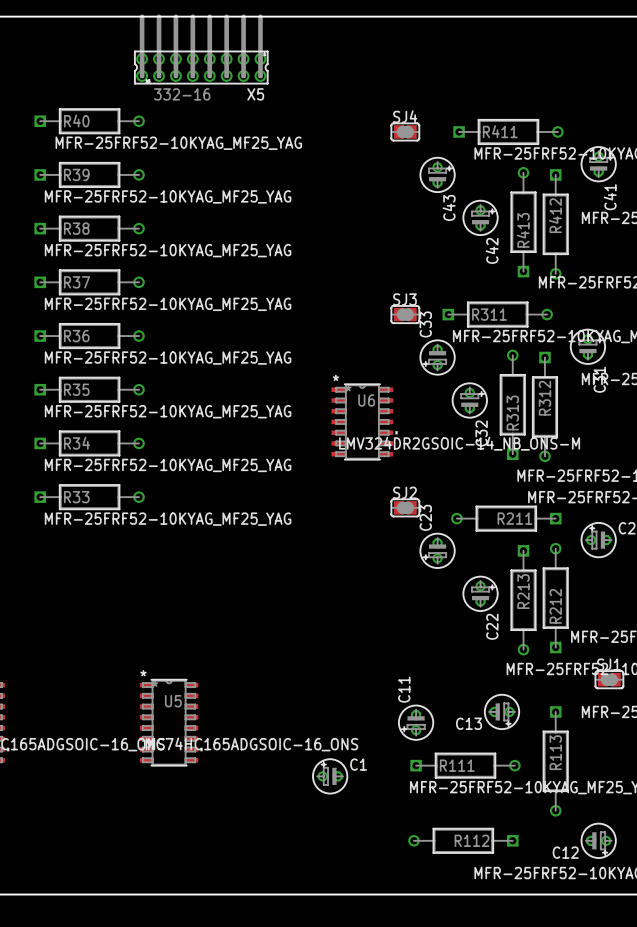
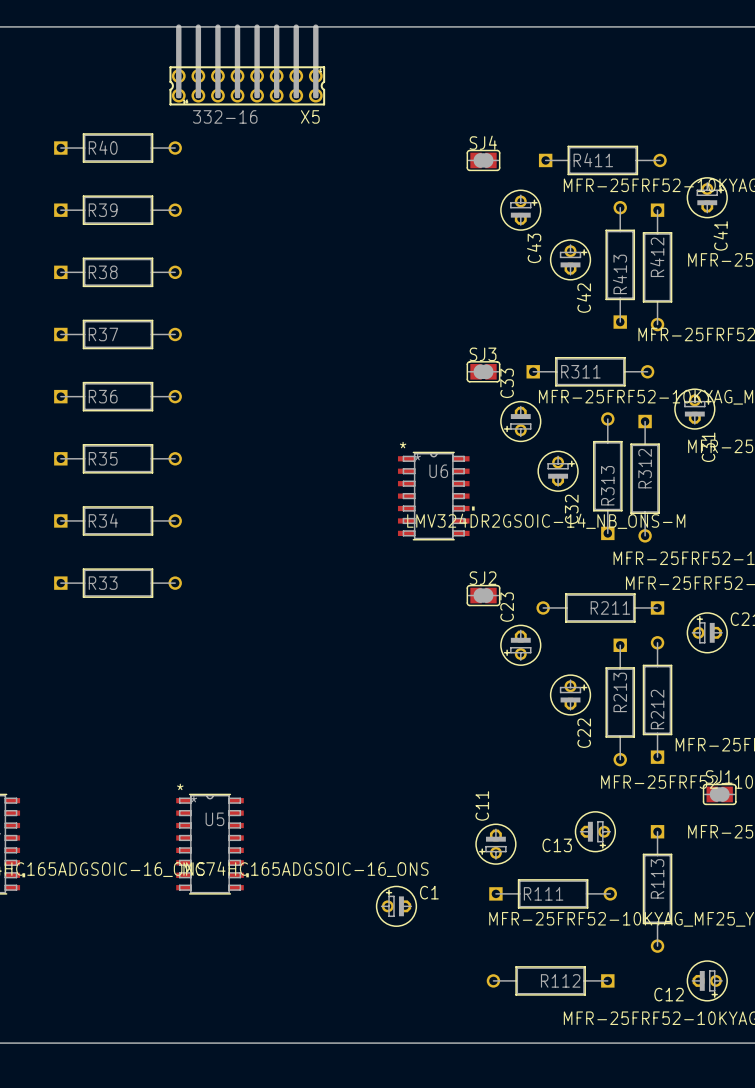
R40 value: MFR-25FRF52-10KYAG_MF25_YAG (178, 143) -> none
R39 value: MFR-25FRF52-10KYAG_MF25_YAG (168, 196) -> none
R38 value: MFR-25FRF52-10KYAG_MF25_YAG (168, 250) -> none
R37 value: MFR-25FRF52-10KYAG_MF25_YAG (168, 304) -> none
R36 value: MFR-25FRF52-10KYAG_MF25_YAG (168, 358) -> none
R35 value: MFR-25FRF52-10KYAG_MF25_YAG (168, 411) -> none
R34 value: MFR-25FRF52-10KYAG_MF25_YAG (168, 465) -> none
R33 value: MFR-25FRF52-10KYAG_MF25_YAG (168, 519) -> none

